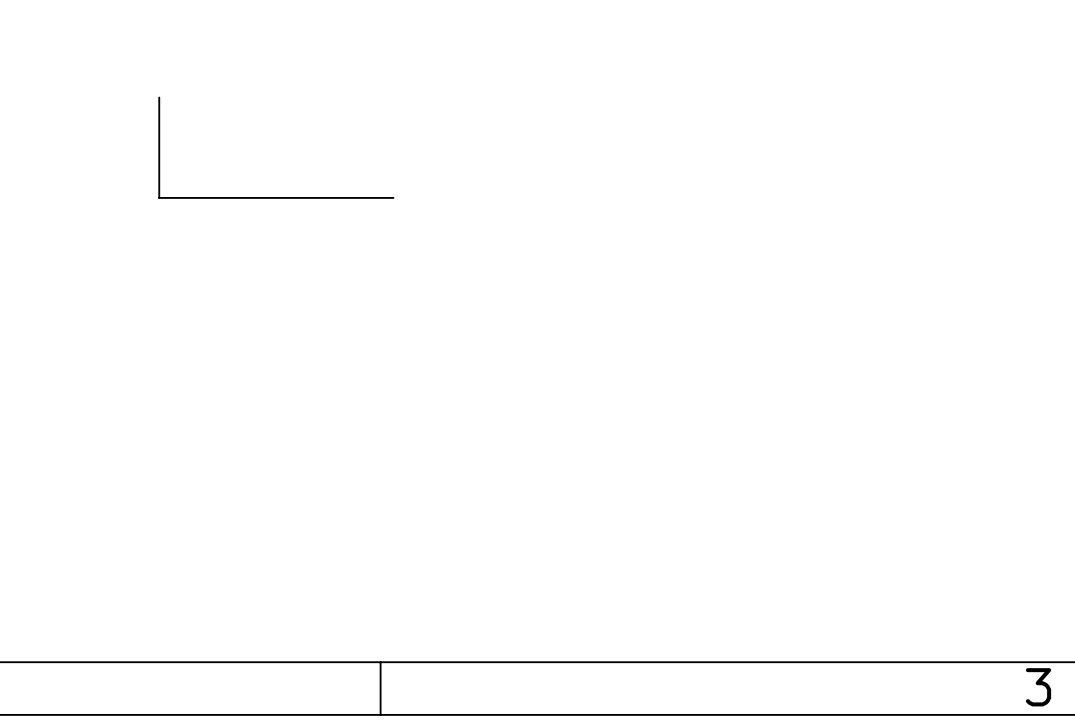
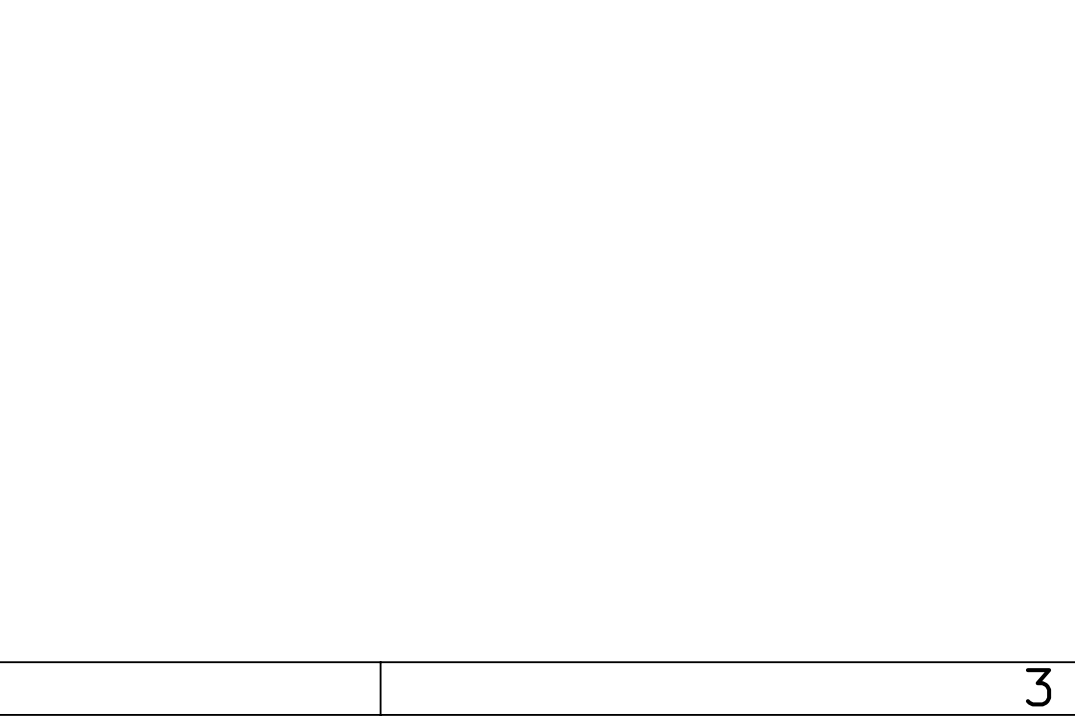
wire: (159, 97) (159, 197) (393, 197) -> none

